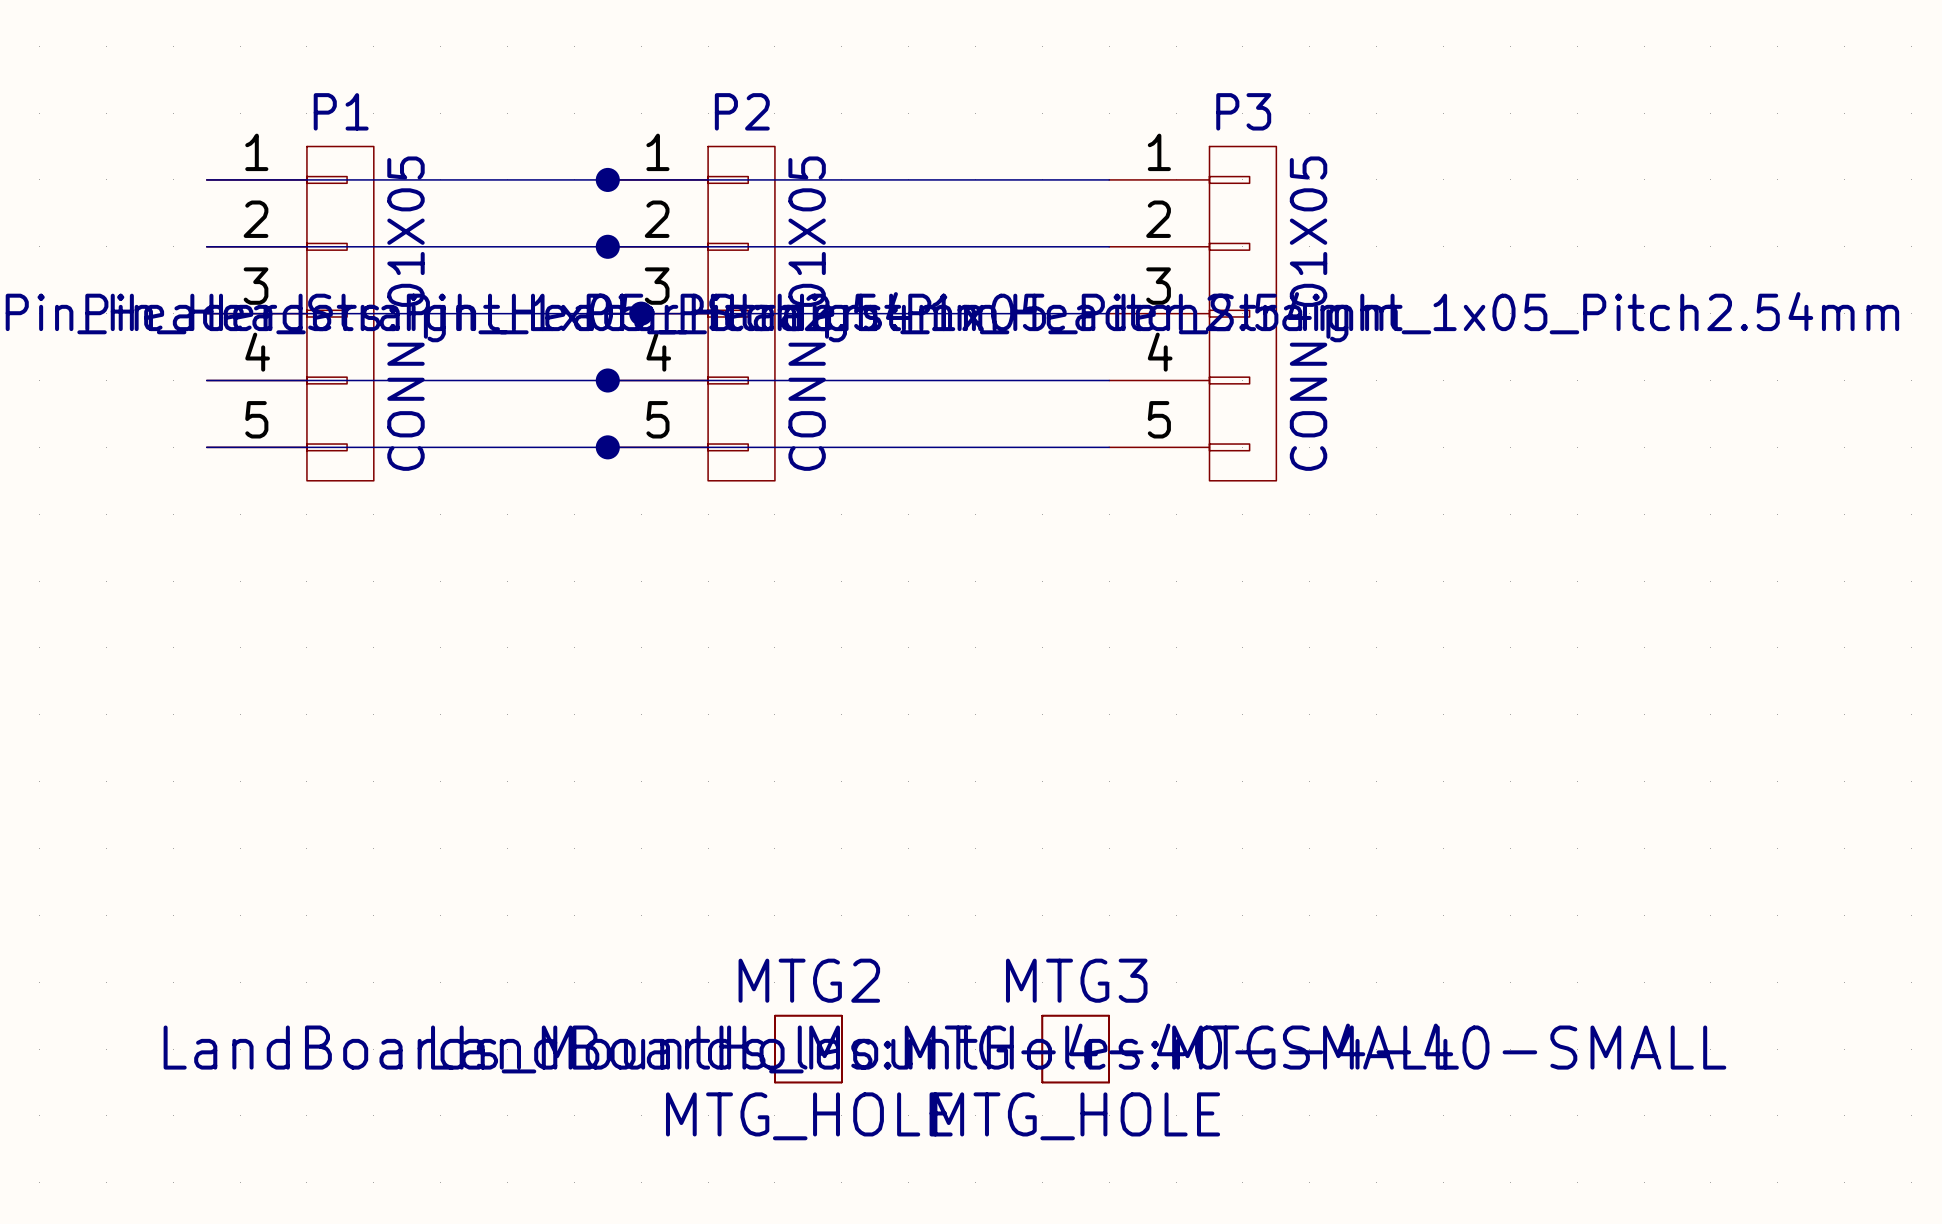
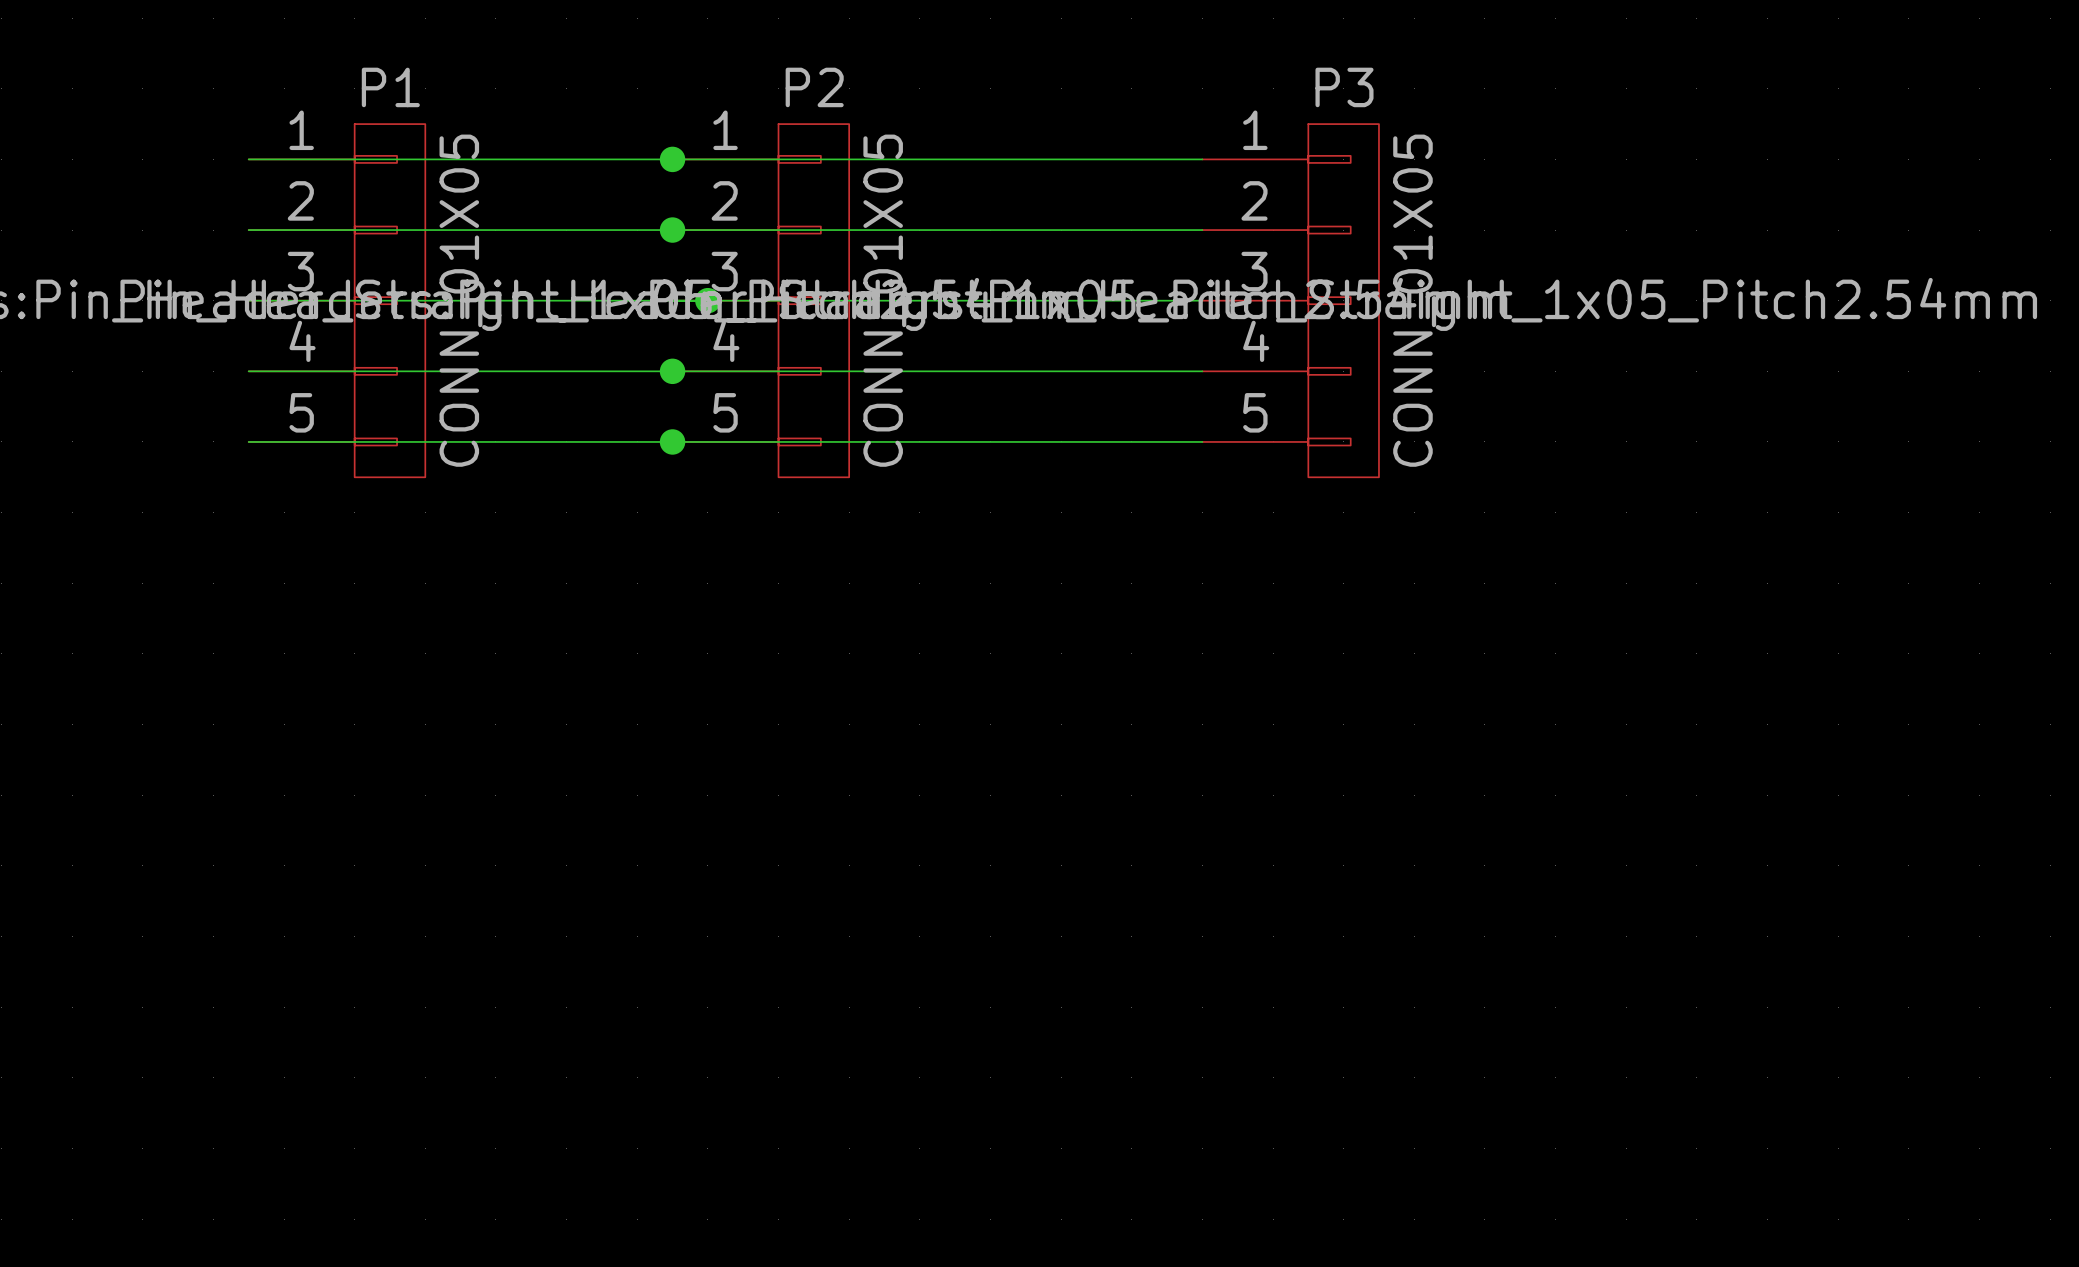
MTG2: MTG_HOLE (808, 1049) -> none
MTG3: MTG_HOLE (1075, 1049) -> none

